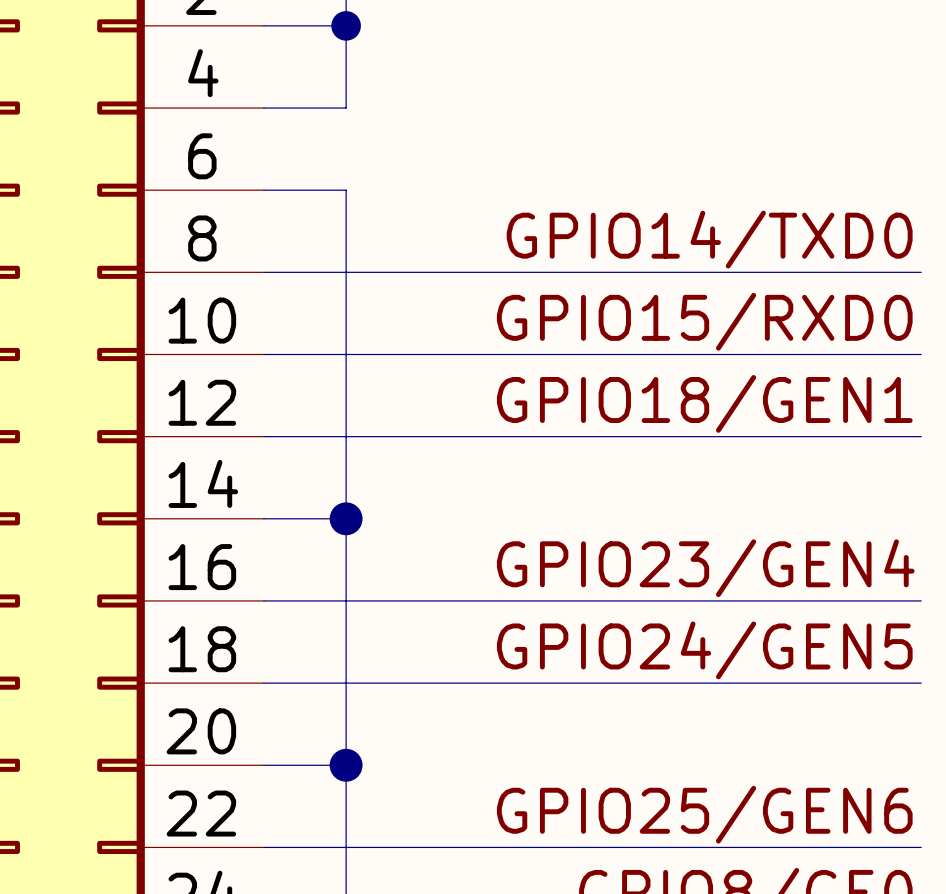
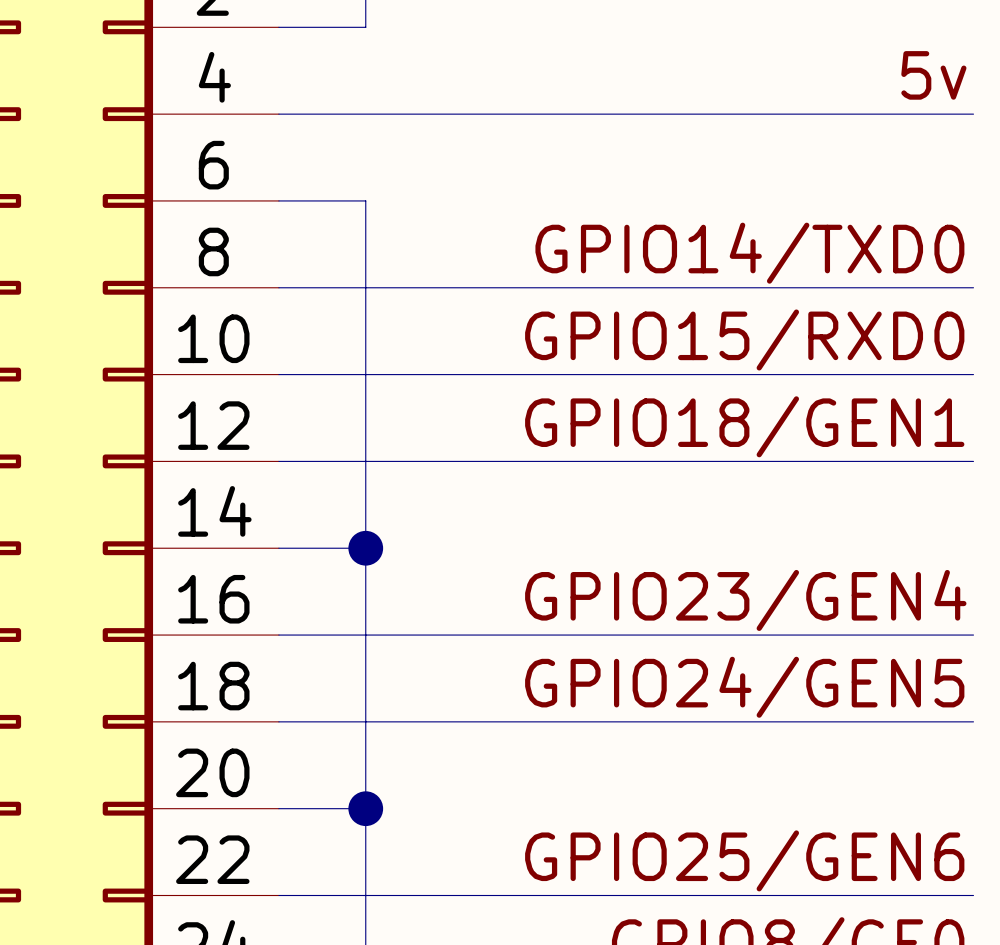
wire: (346, 25) (346, 108) -> (973, 114) (365, 114)
junction: (346, 25) -> none
label: none -> 5v (933, 75)

